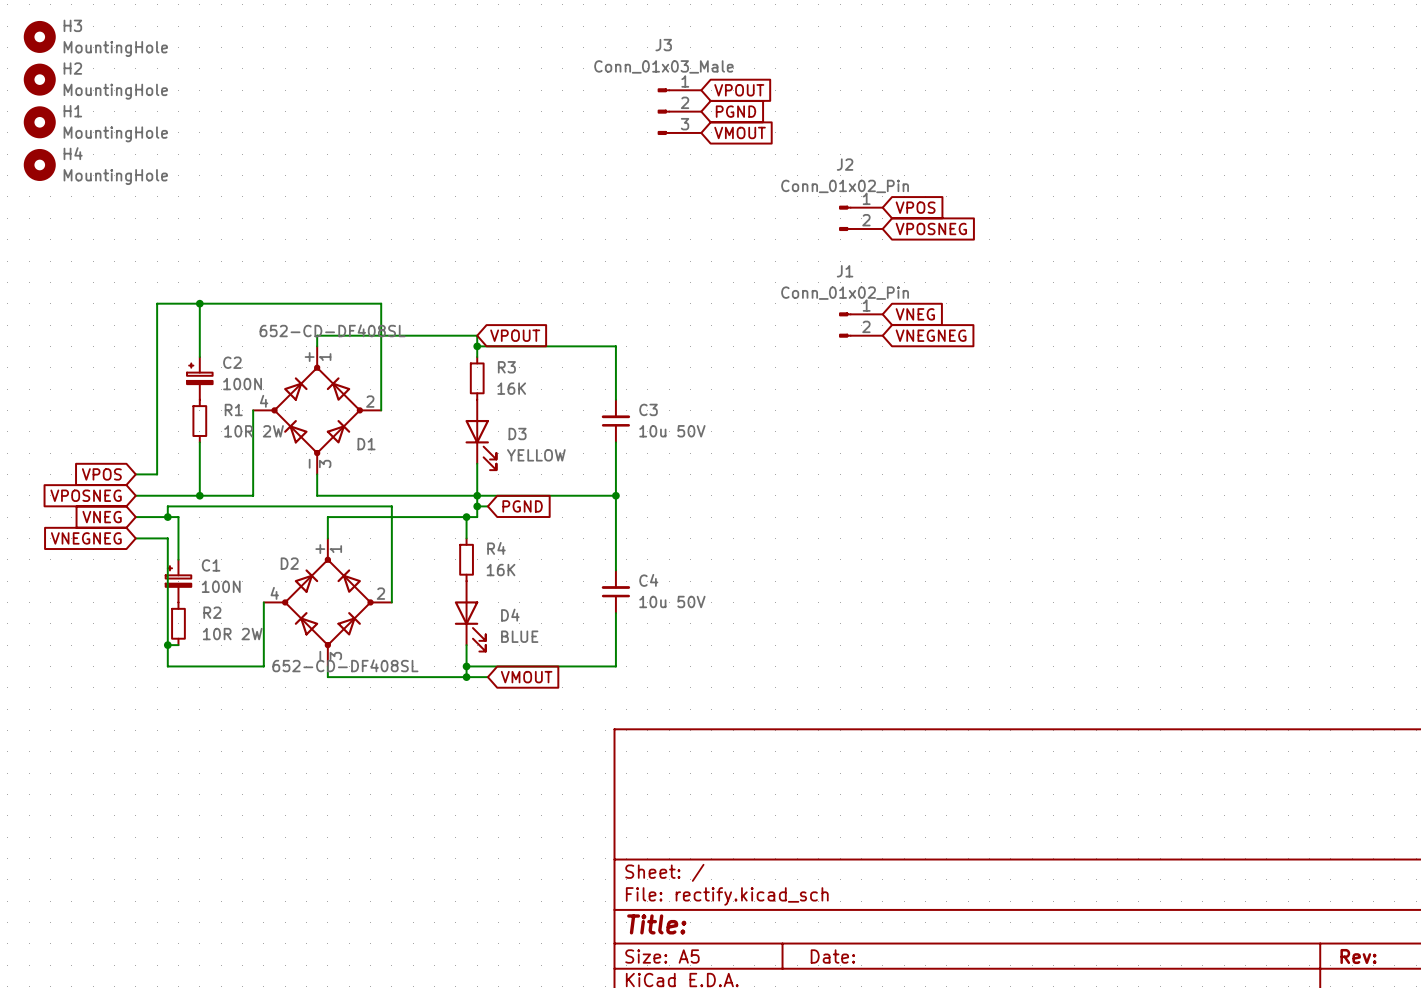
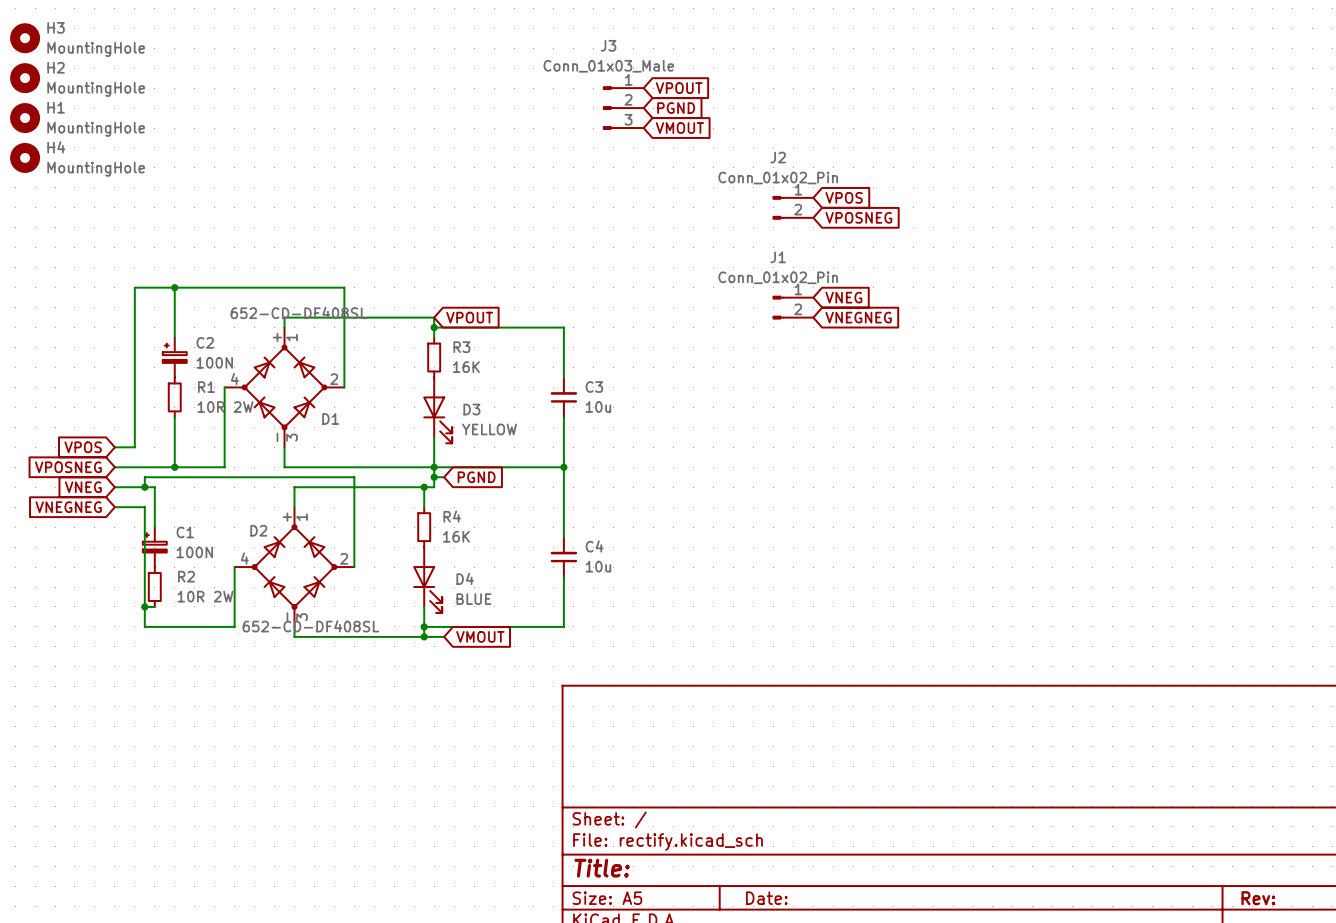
C3 value: 10u 50V (672, 431) -> 10u (598, 406)
C4 value: 10u 50V (672, 601) -> 10u (598, 566)

